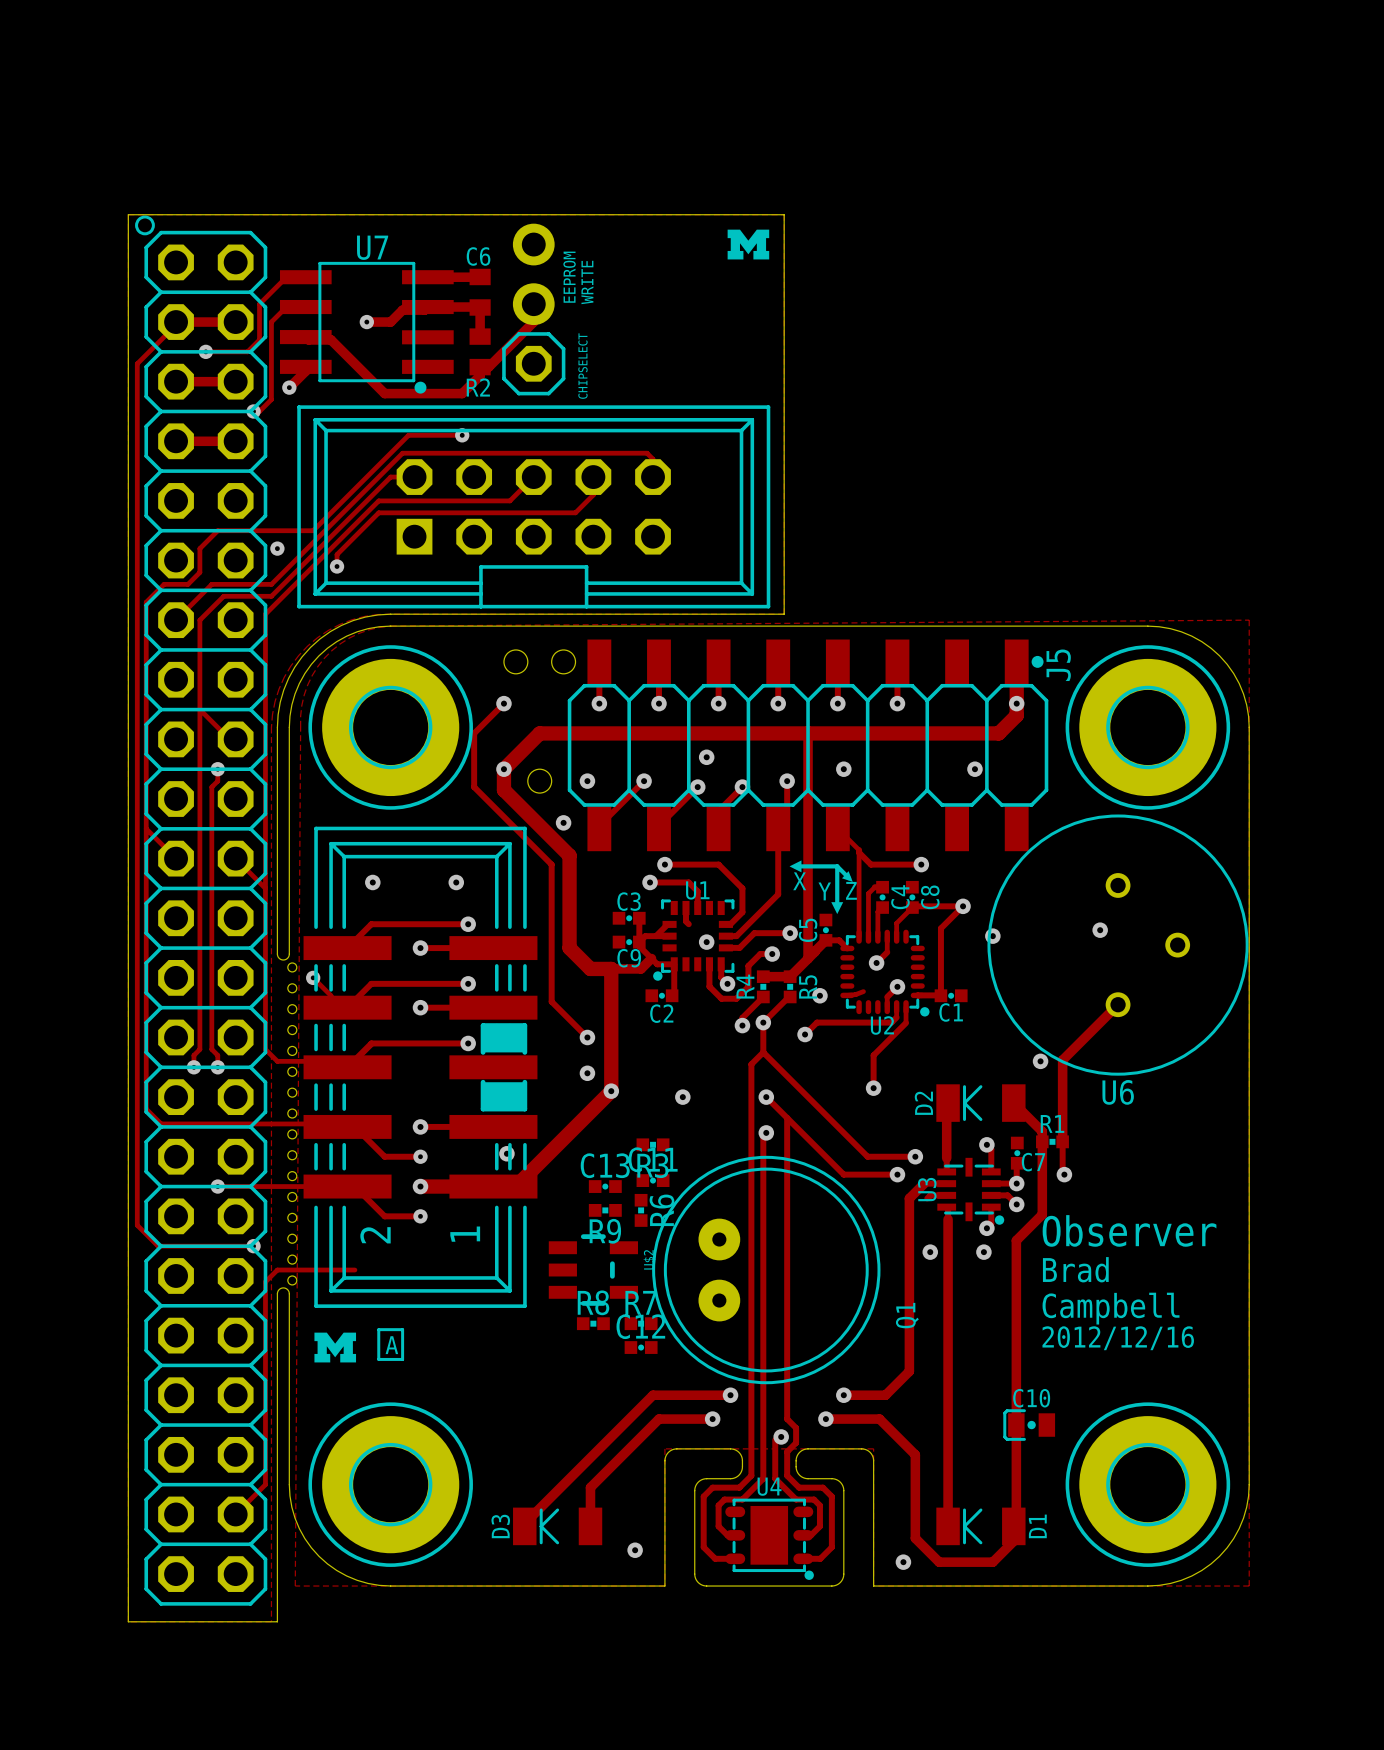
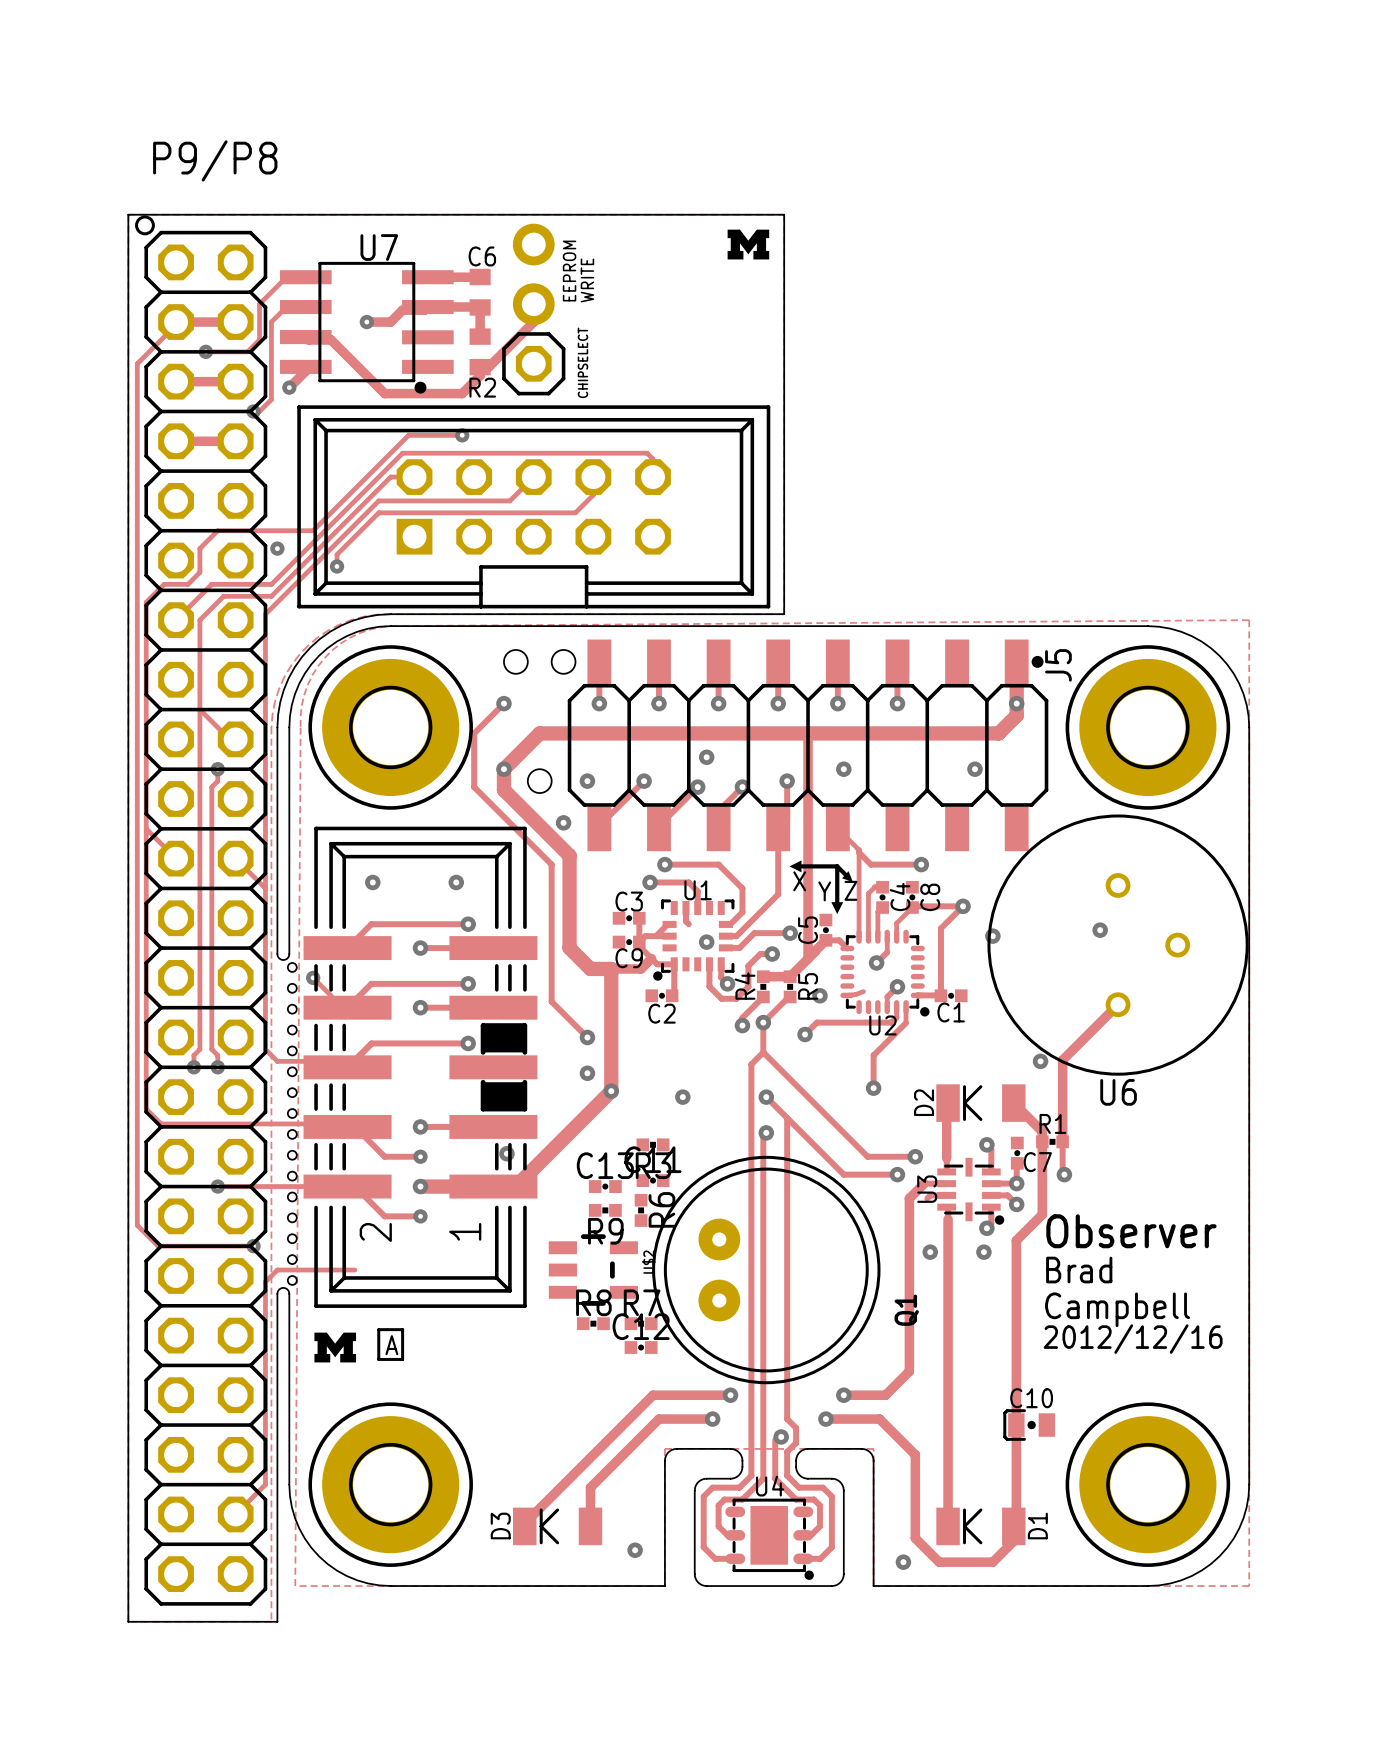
P9/P8 name: none -> P9/P8 (215, 160)

